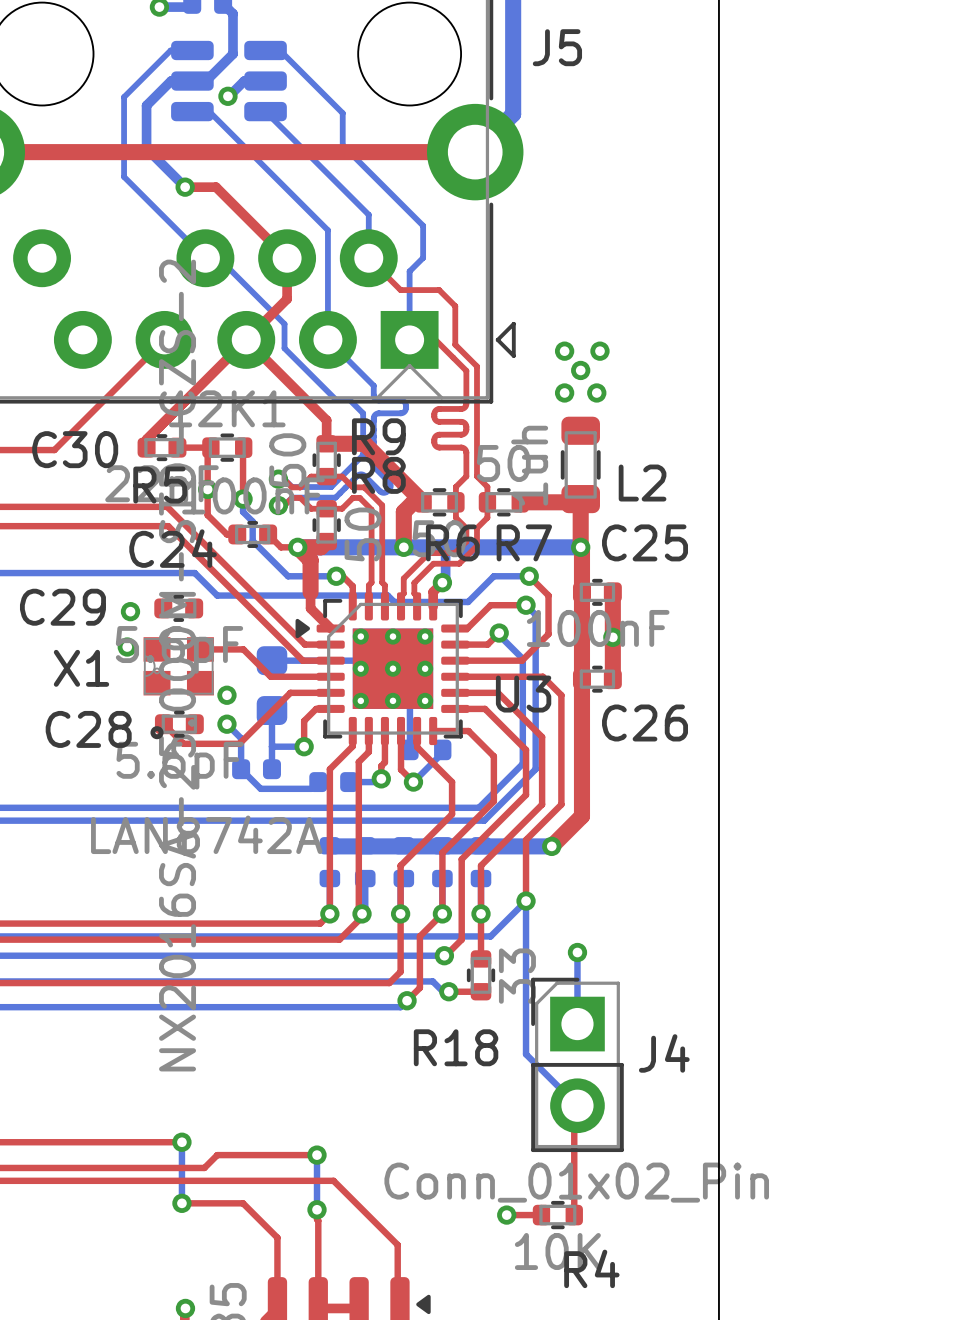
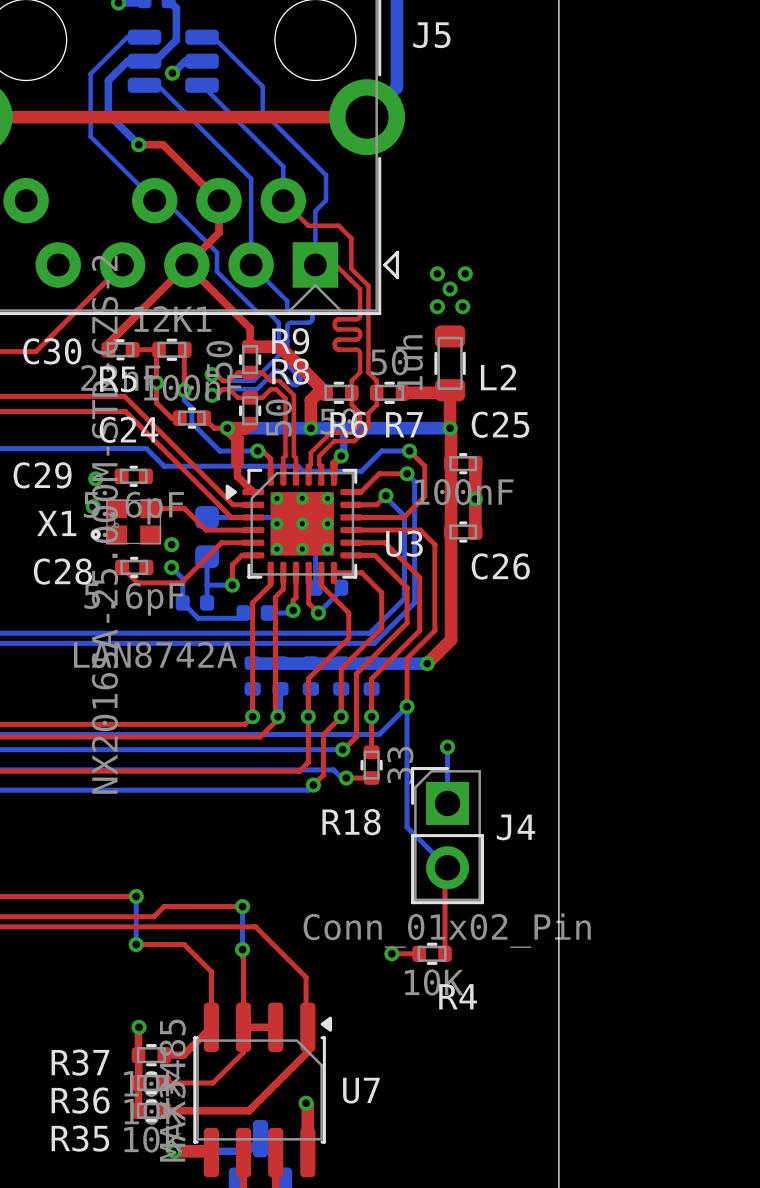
X1 footprint: [143, 637, 214, 740] -> [90, 498, 162, 545]

